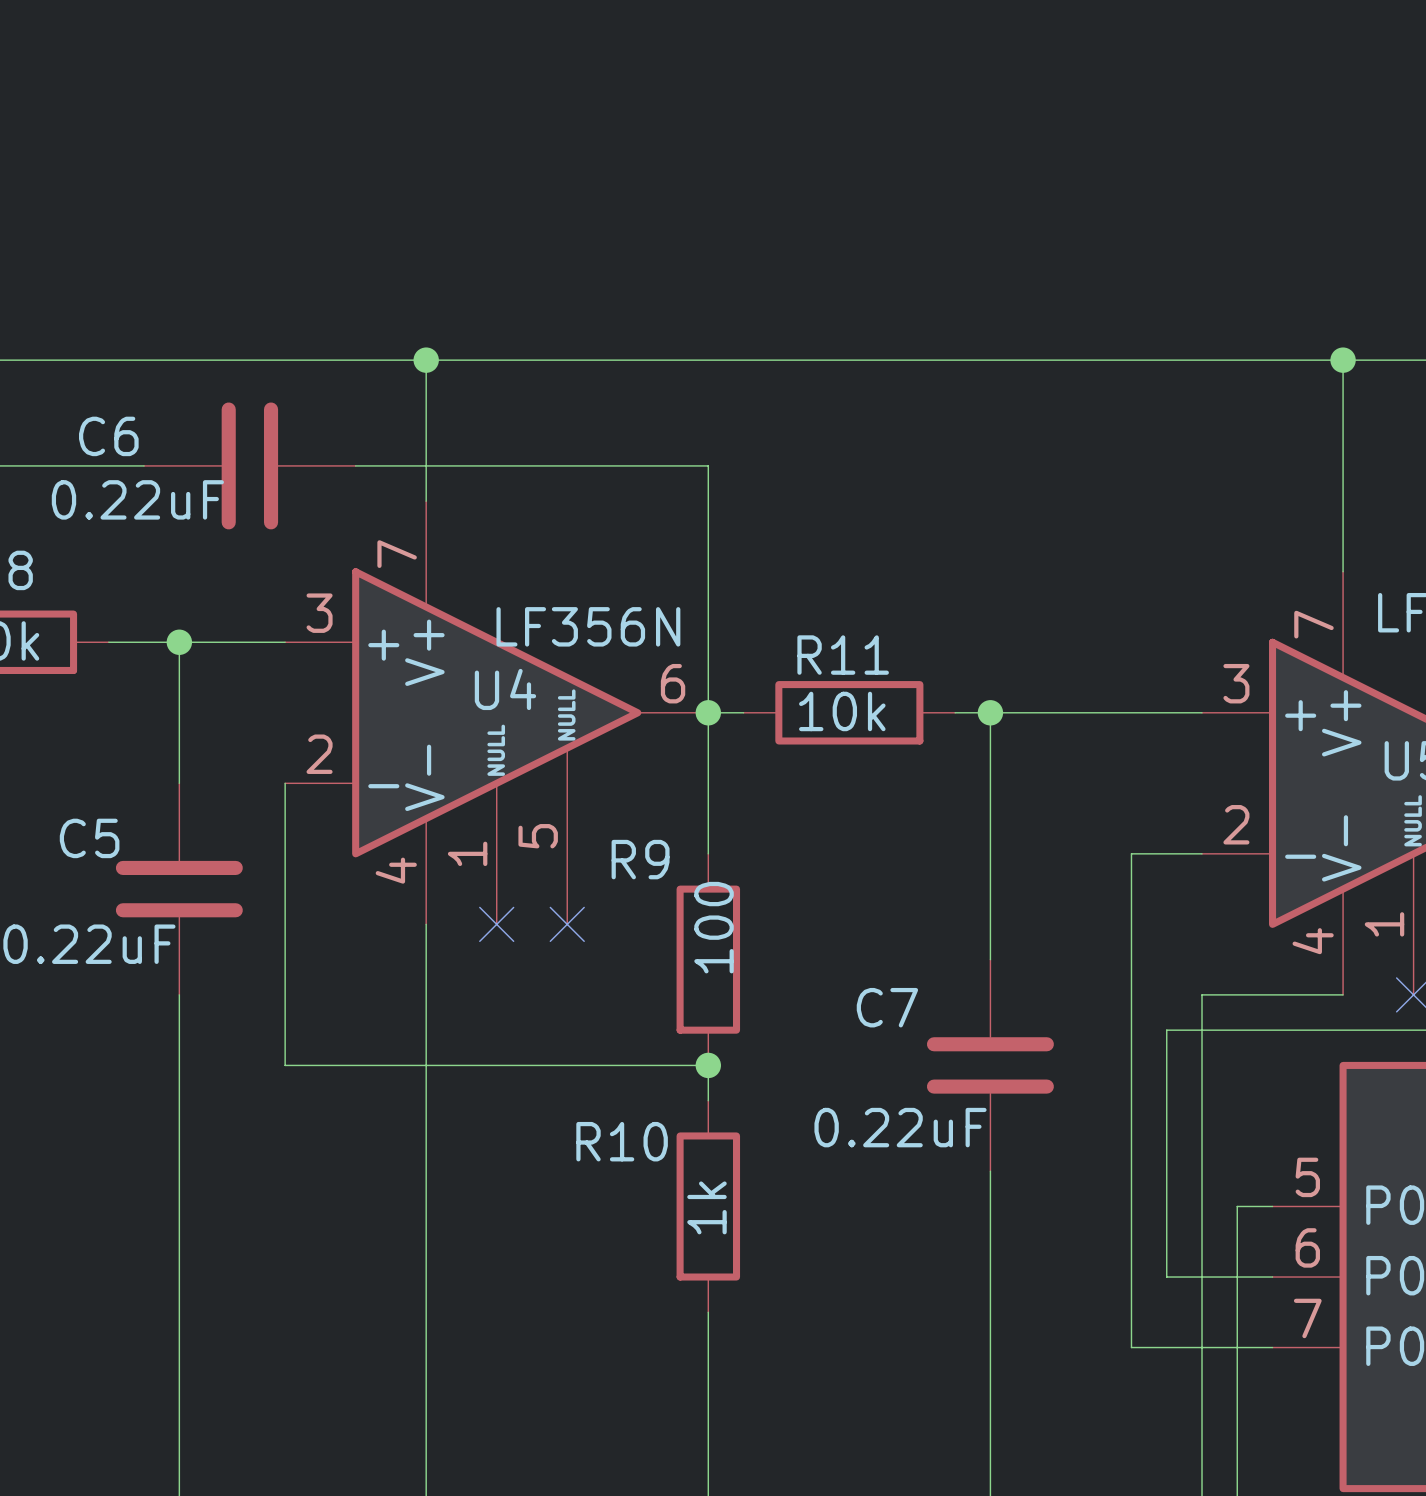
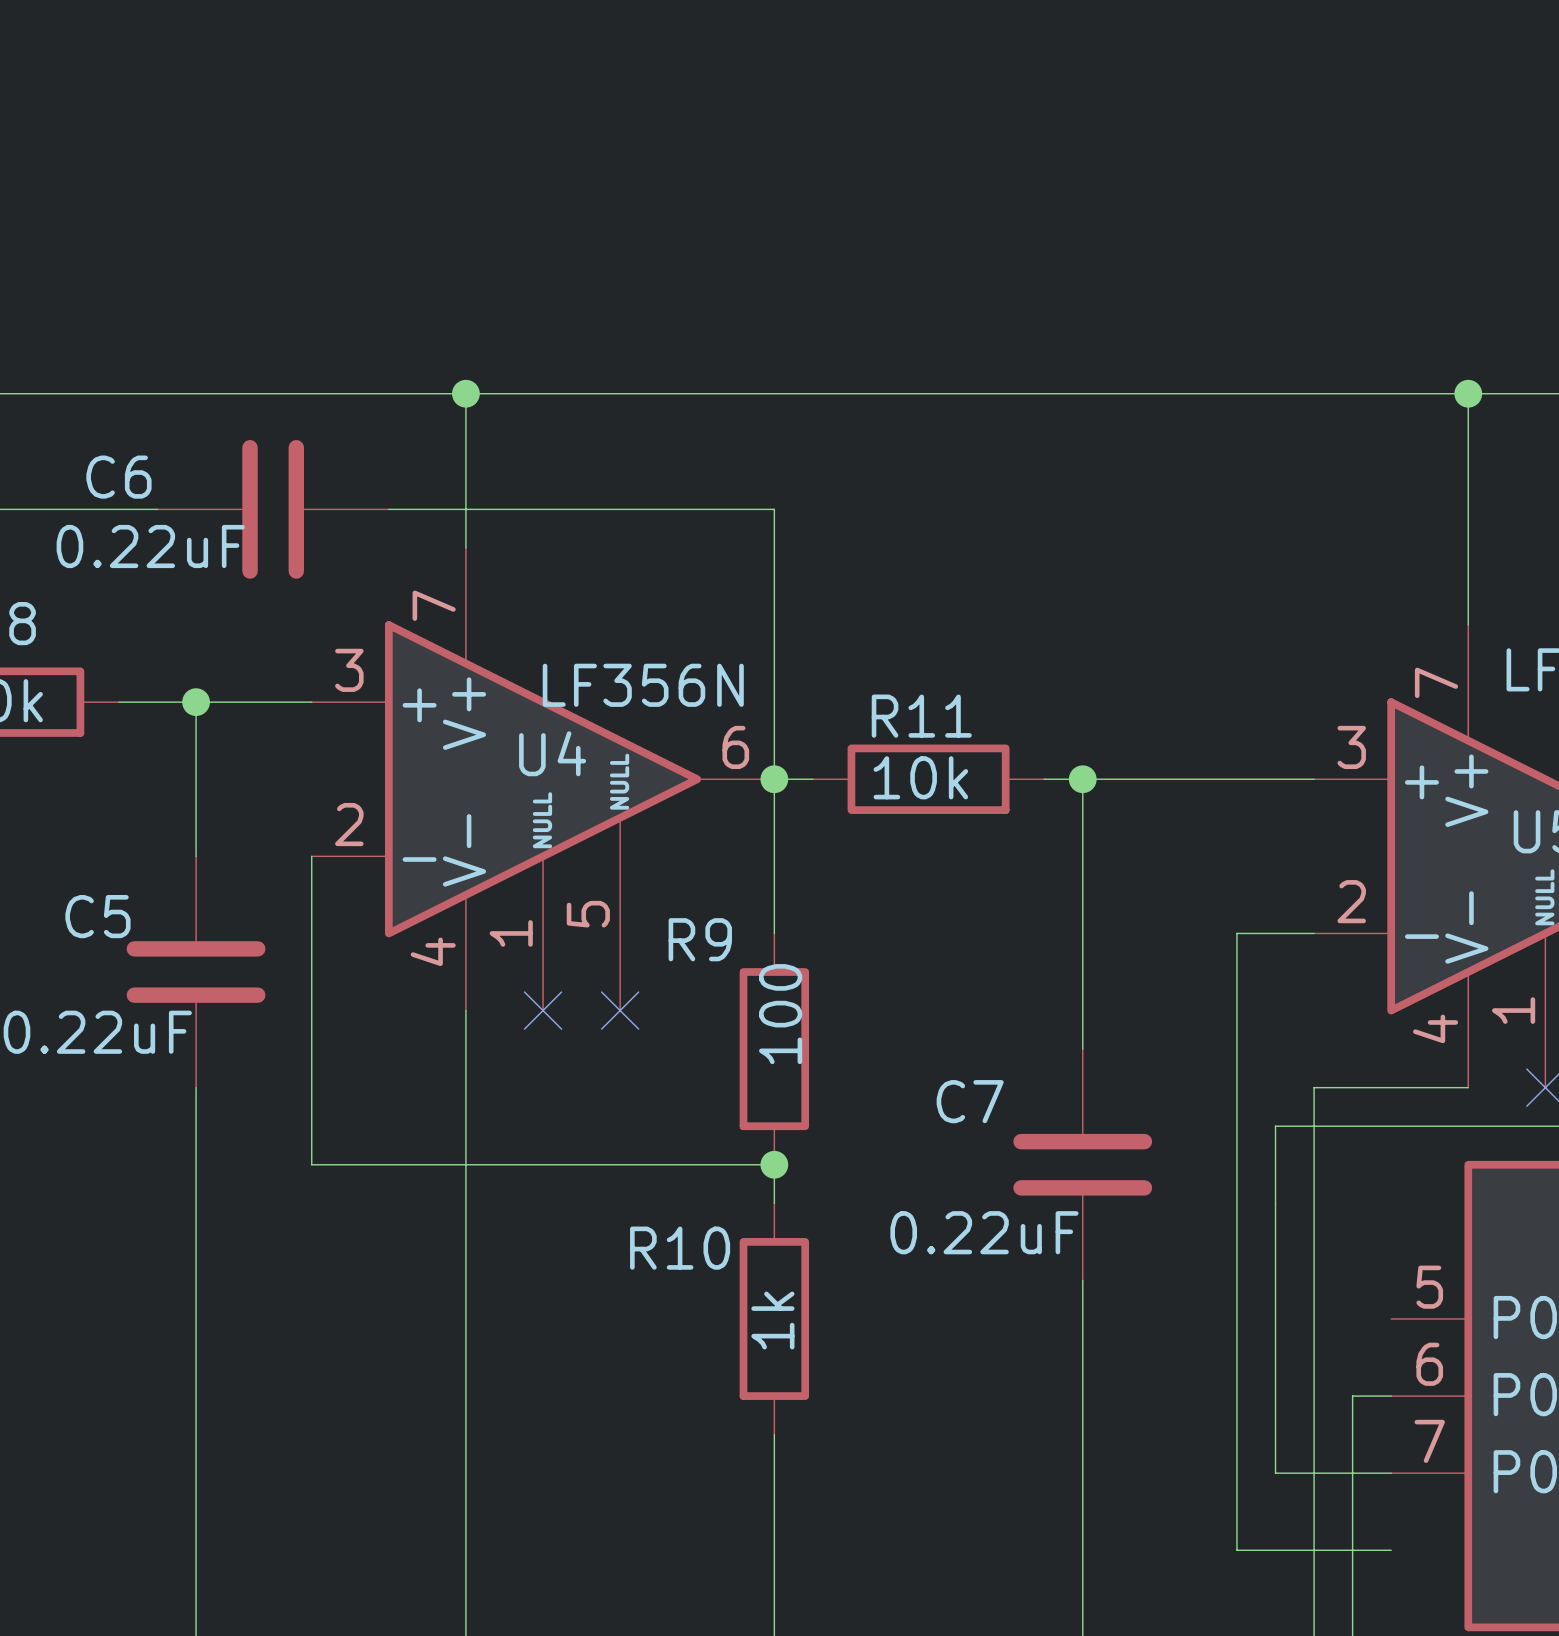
wire: (1272, 1206) (1237, 1206) (1237, 1277) (1166, 1277) -> none
wire: (1131, 1347) (1166, 1347) -> (1275, 1396) (1275, 1473)
wire: none -> (1236, 1473) (1236, 1550) (1391, 1550)

